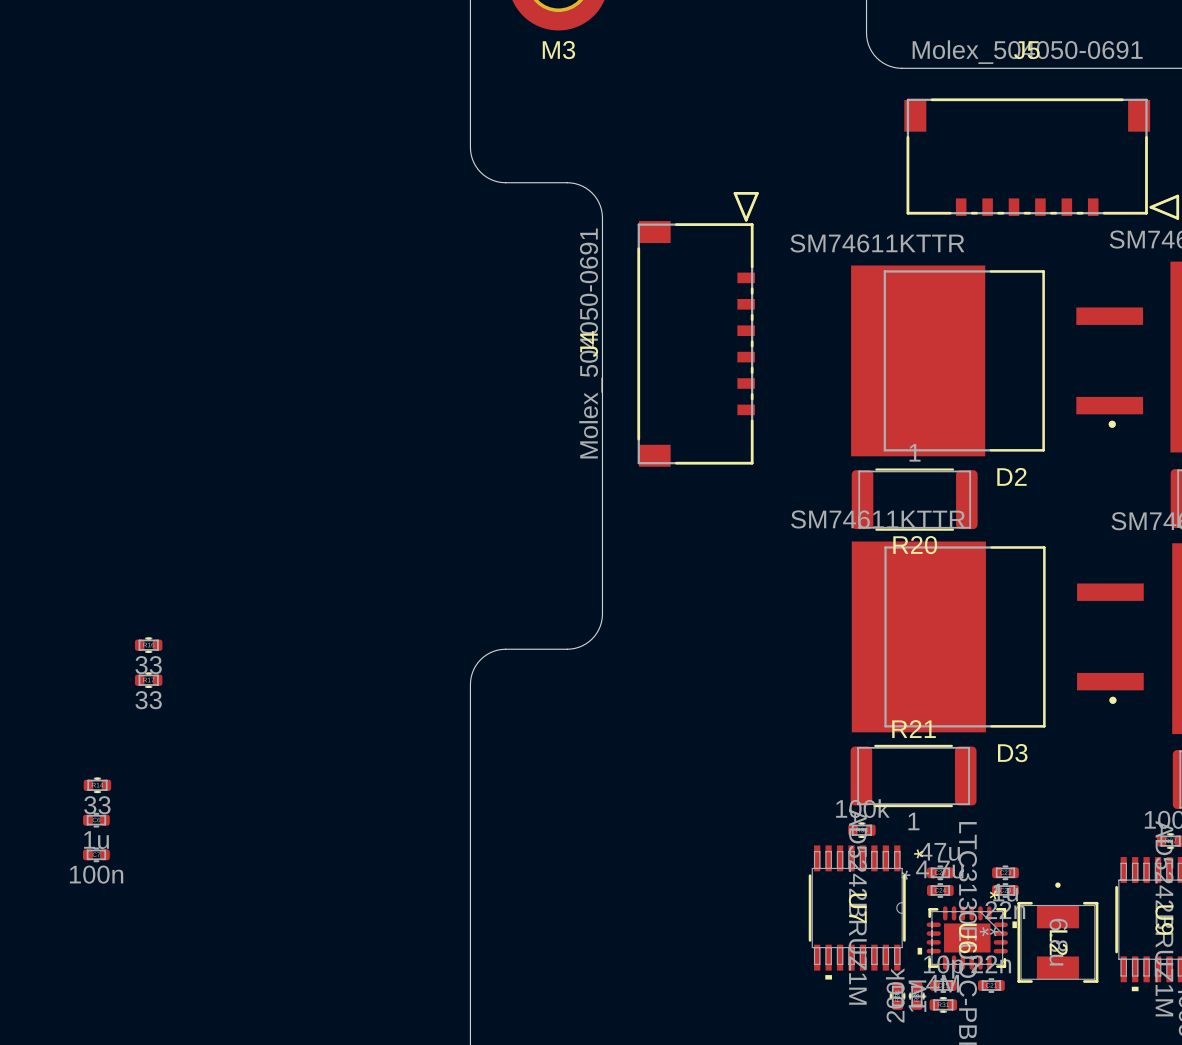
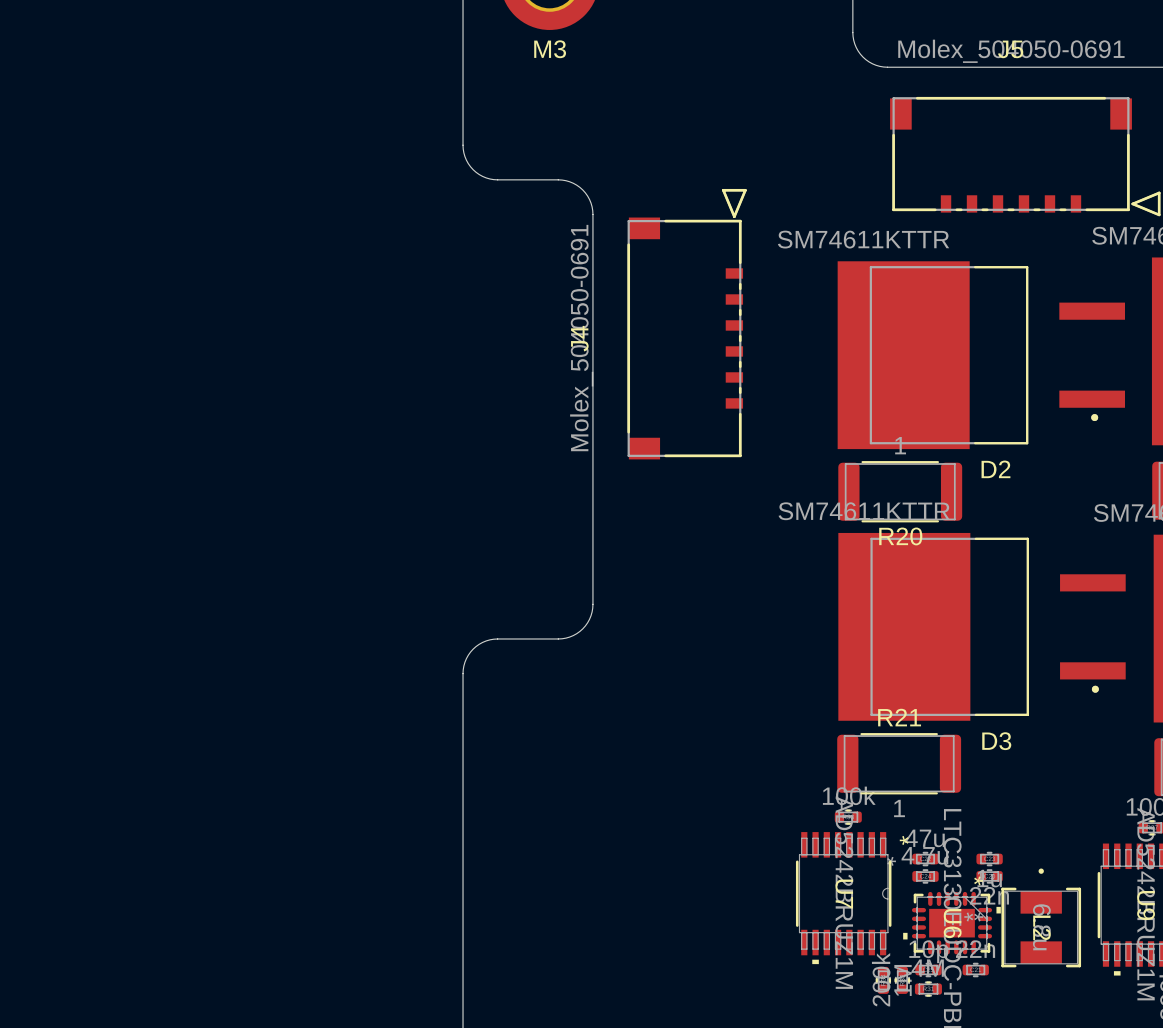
part: 33 (148, 645) -> none
part: 33 (148, 680) -> none
part: 33 (97, 785) -> none
part: 1u (96, 820) -> none
part: 100n (96, 854) -> none

